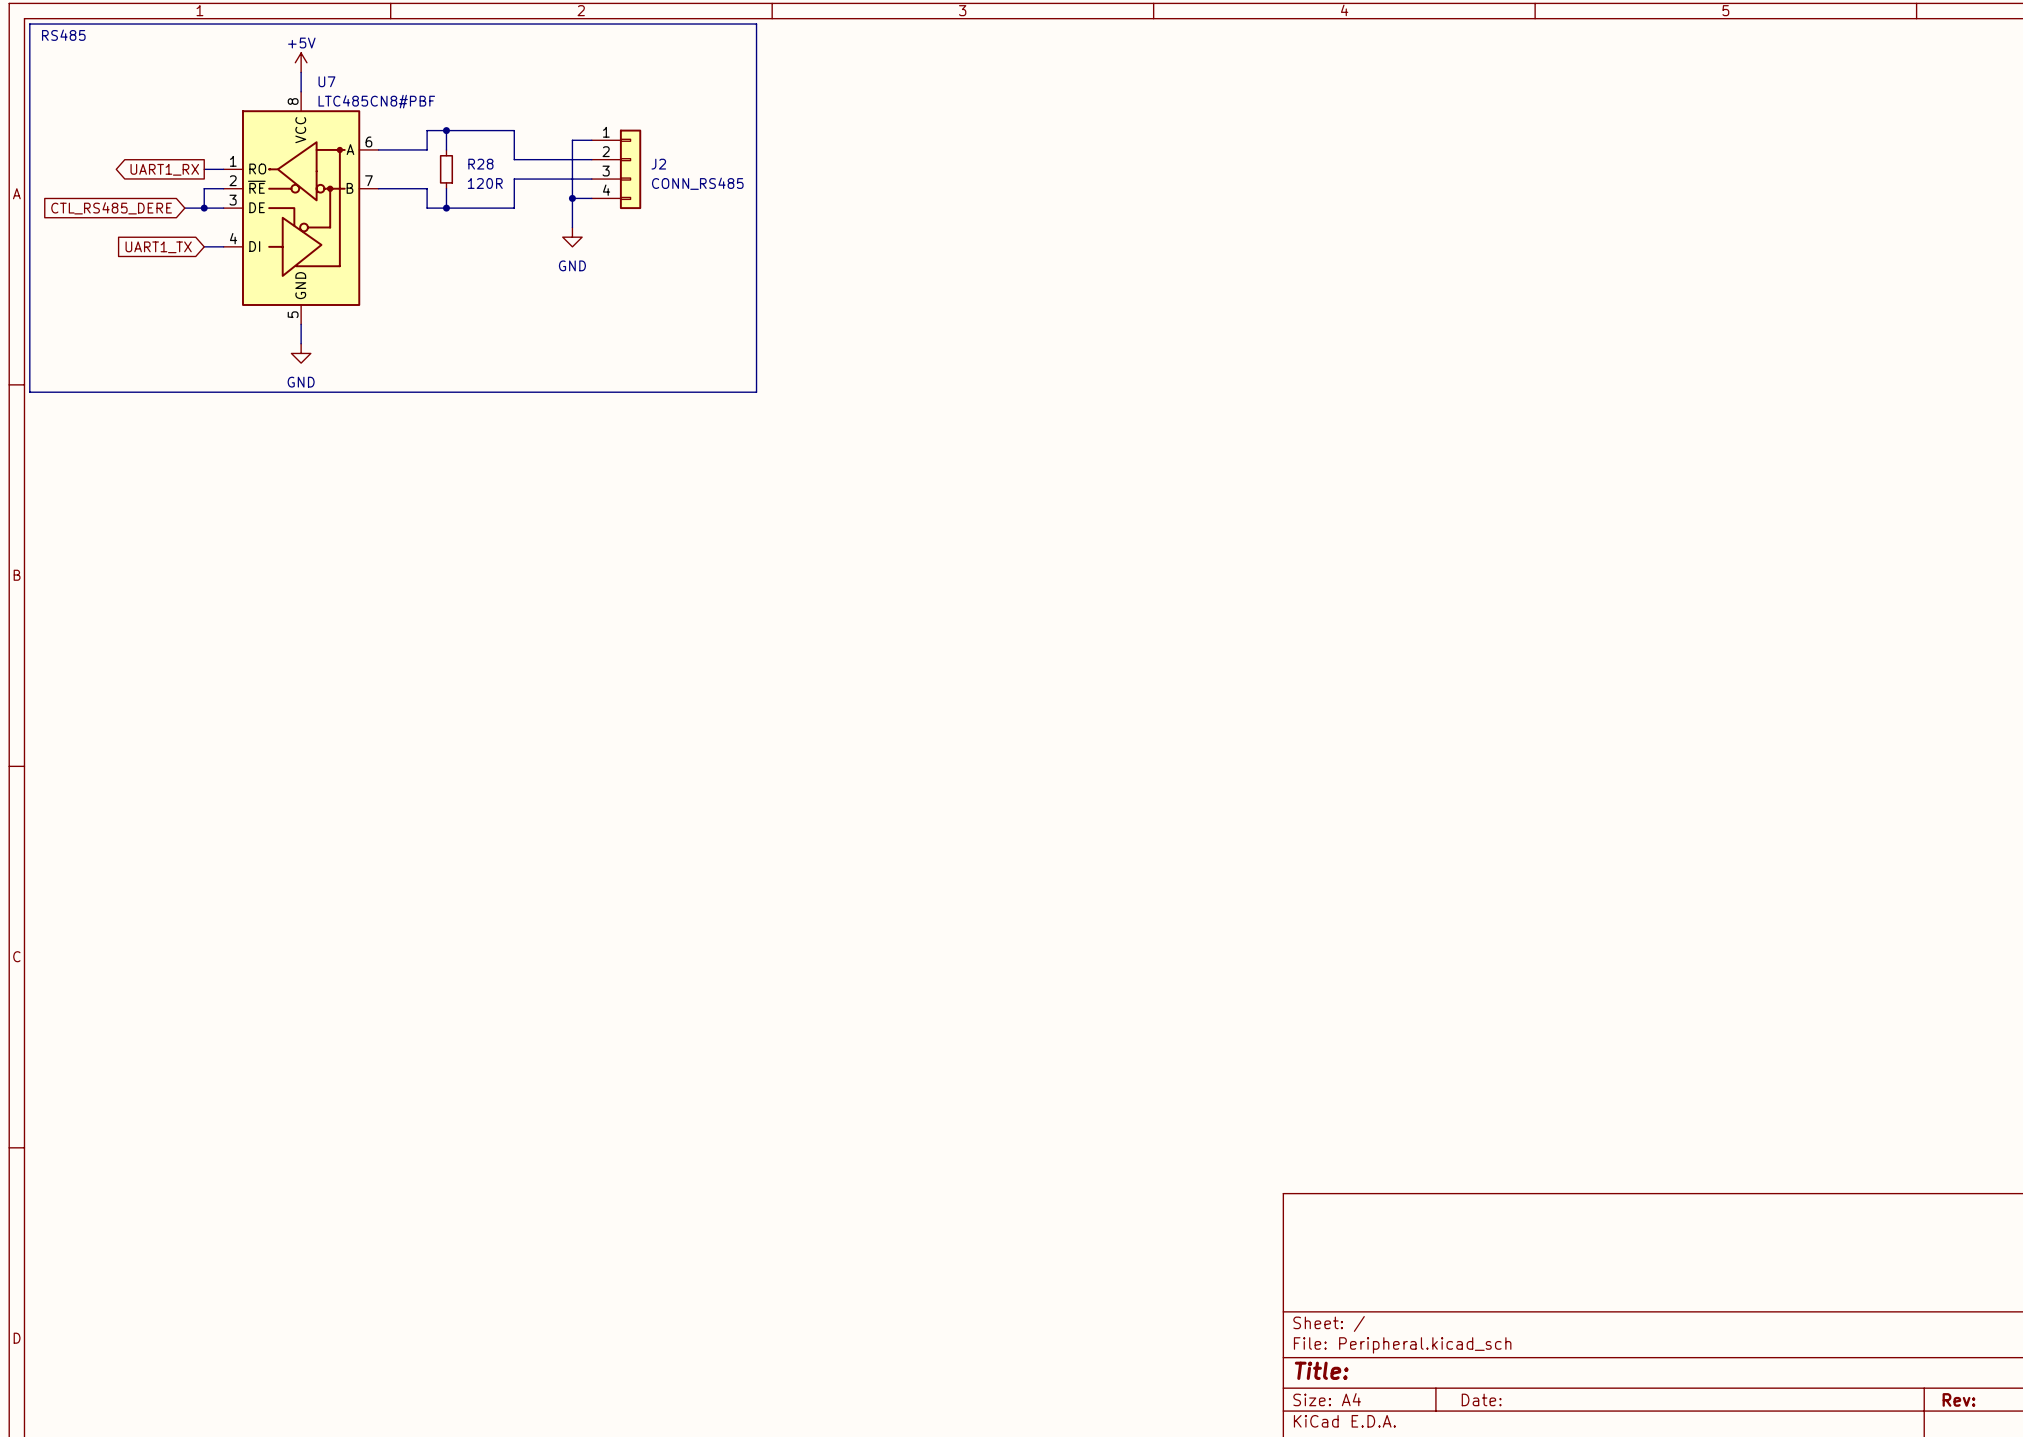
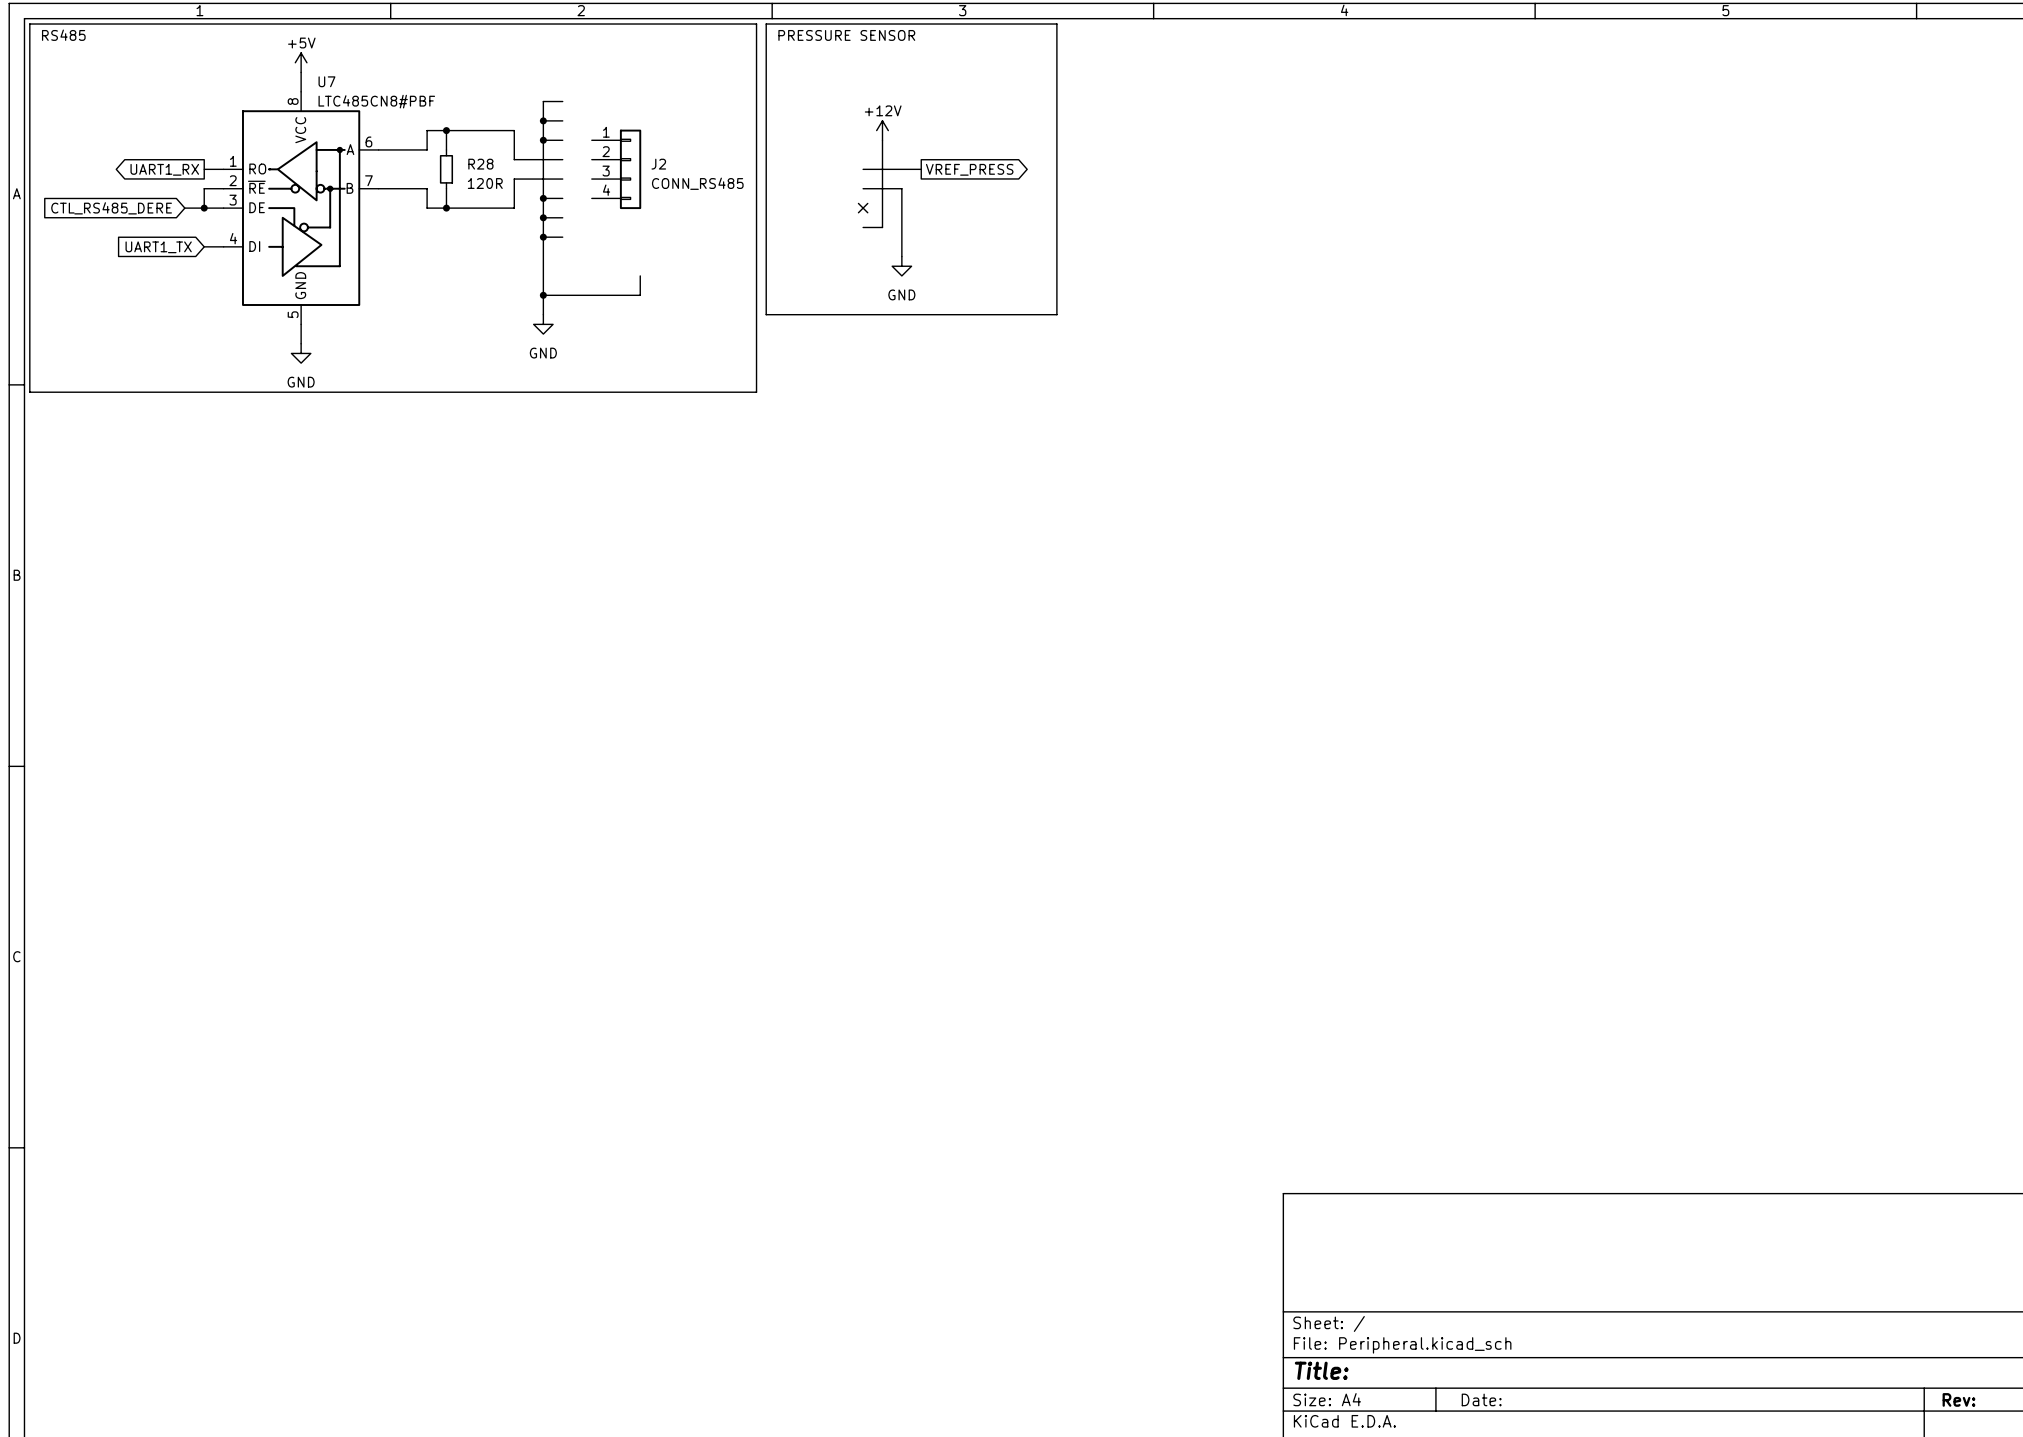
line: none -> (766, 24) (1056, 24) (1056, 314) (766, 314) (766, 24)
text: none -> PRESSURE SENSOR (846, 35)
wire: none -> (562, 101) (543, 101) (543, 314)
wire: none -> (543, 120) (562, 120)
junction: none -> (543, 120)
power symbol: none -> +12V (882, 130)
wire: none -> (543, 140) (562, 140)
junction: none -> (543, 140)
wire: (591, 140) (572, 140) (572, 227) -> none
wire: none -> (882, 140) (882, 227) (863, 227)
wire: (562, 159) (591, 159) -> none
wire: none -> (863, 169) (921, 169)
global label: none -> VREF_PRESS (969, 169)
wire: (562, 179) (591, 179) -> none
wire: none -> (863, 188) (901, 188) (901, 256)
junction: none -> (543, 198)
wire: (572, 198) (591, 198) -> (543, 198) (562, 198)
junction: (572, 198) -> none
no-connect mark: none -> (863, 208)
wire: none -> (543, 217) (562, 217)
junction: none -> (543, 217)
wire: none -> (543, 237) (562, 237)
junction: none -> (543, 237)
power symbol position: GND (572, 237) -> GND (543, 324)
power symbol: none -> GND (901, 266)
wire: none -> (640, 275) (640, 295) (543, 295)
junction: none -> (543, 295)

